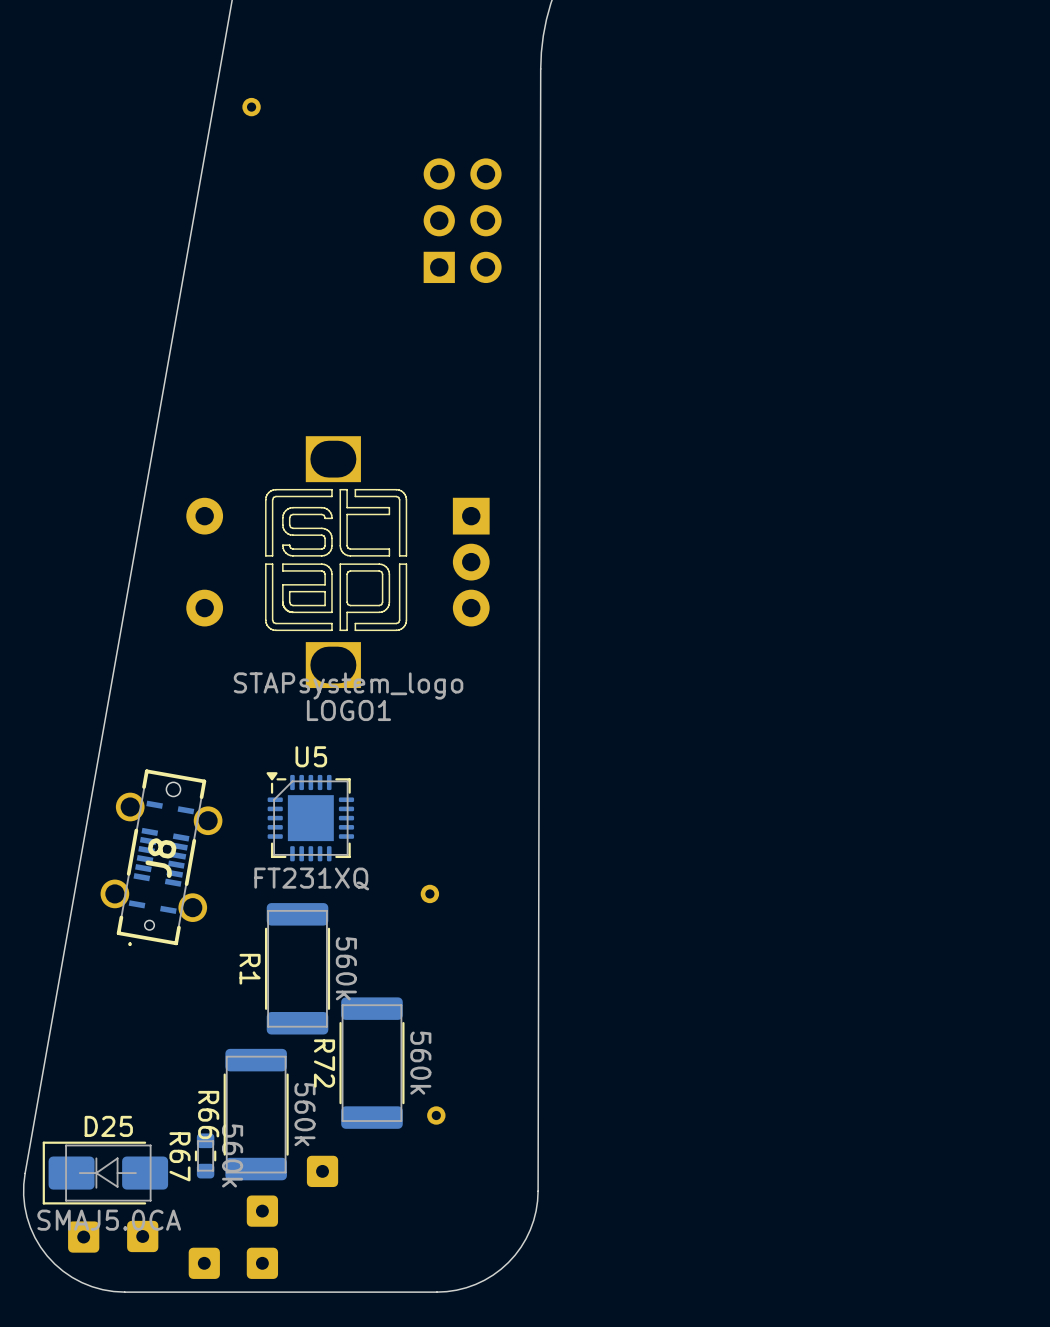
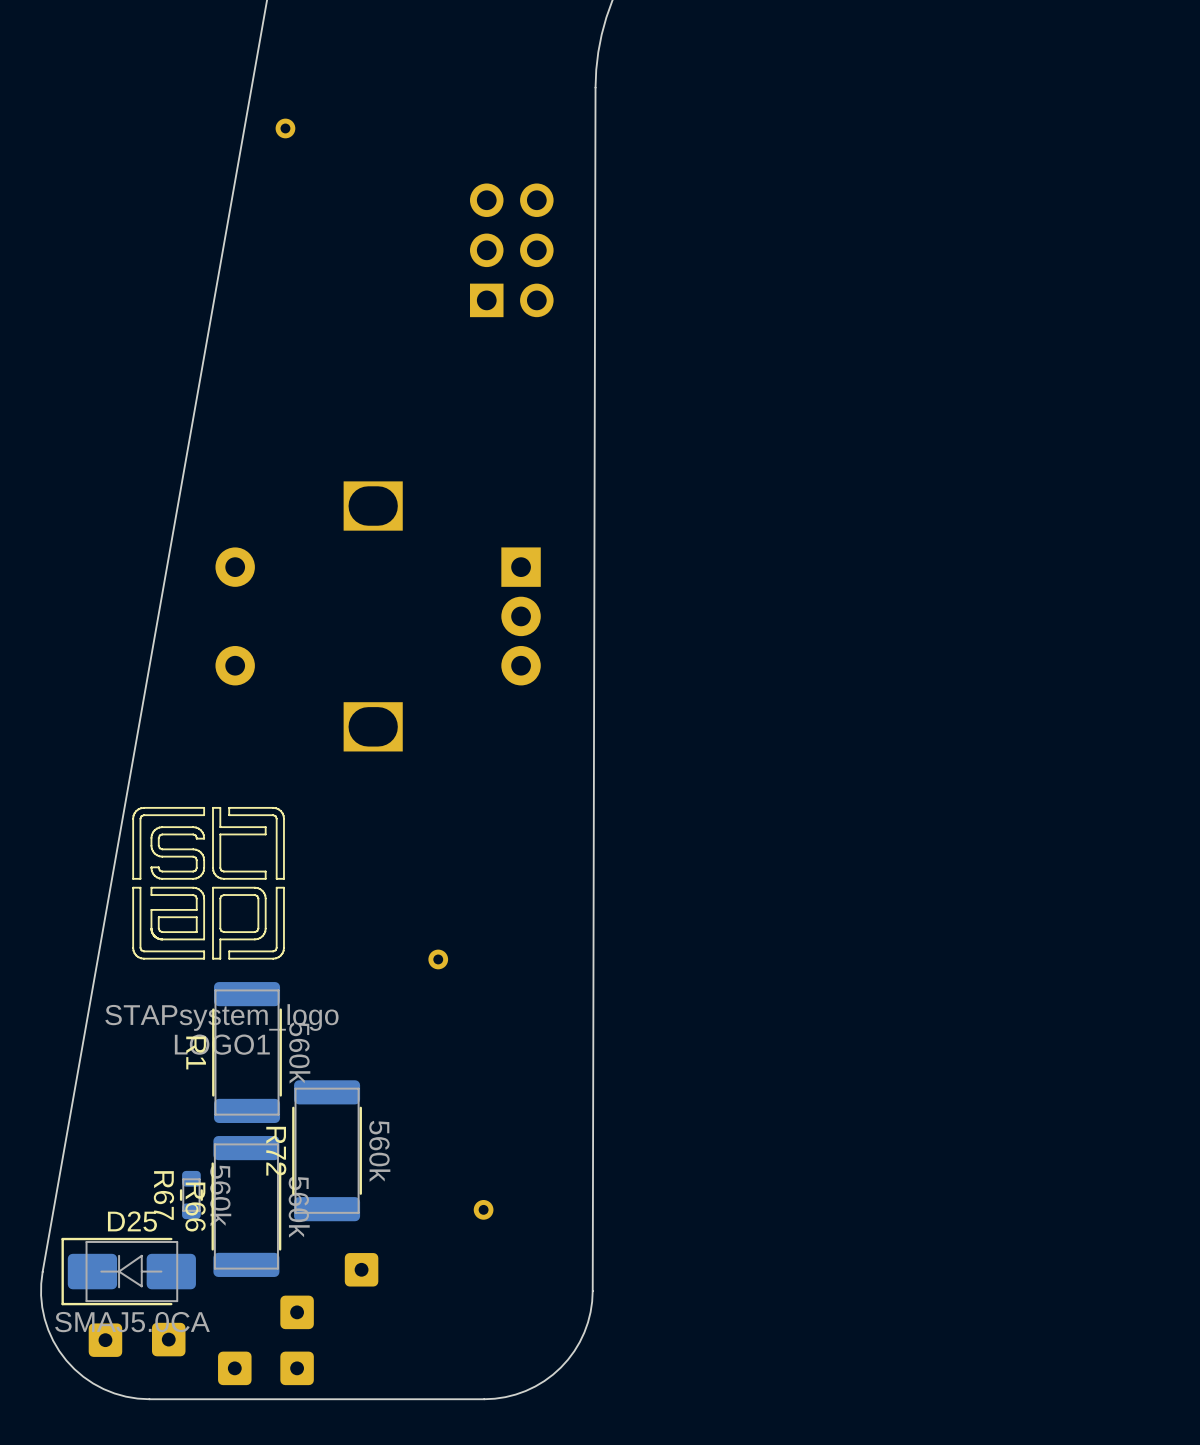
LOGO1 position: (336, 560) -> (208, 883)
U5: FT231XQ (310, 816) -> none
J8: (161, 857) -> none
part position: (429, 893) -> (438, 959)
R1 position: (297, 968) -> (247, 1052)
R72 position: (371, 1063) -> (327, 1150)
R66 position: (256, 1114) -> (246, 1206)
R67 position: (205, 1155) -> (191, 1195)

